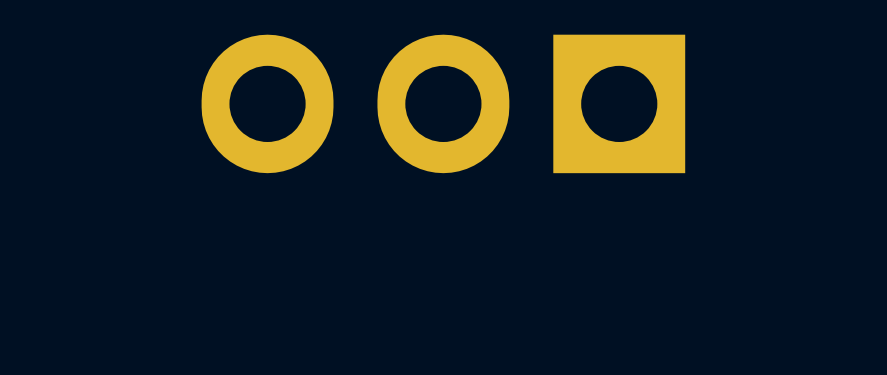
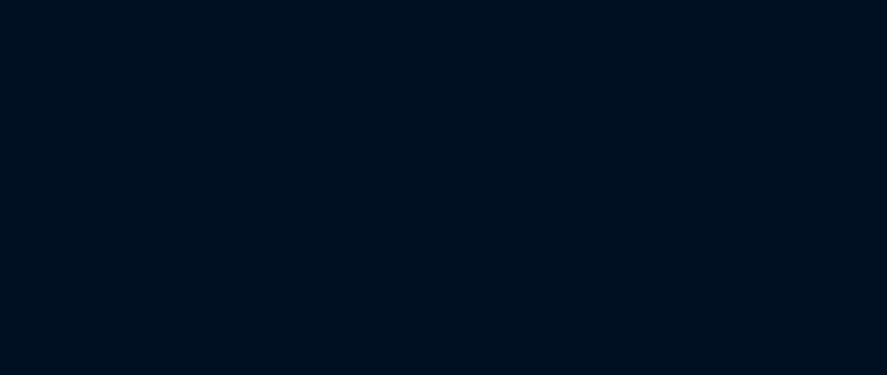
part: (443, 103) -> none

